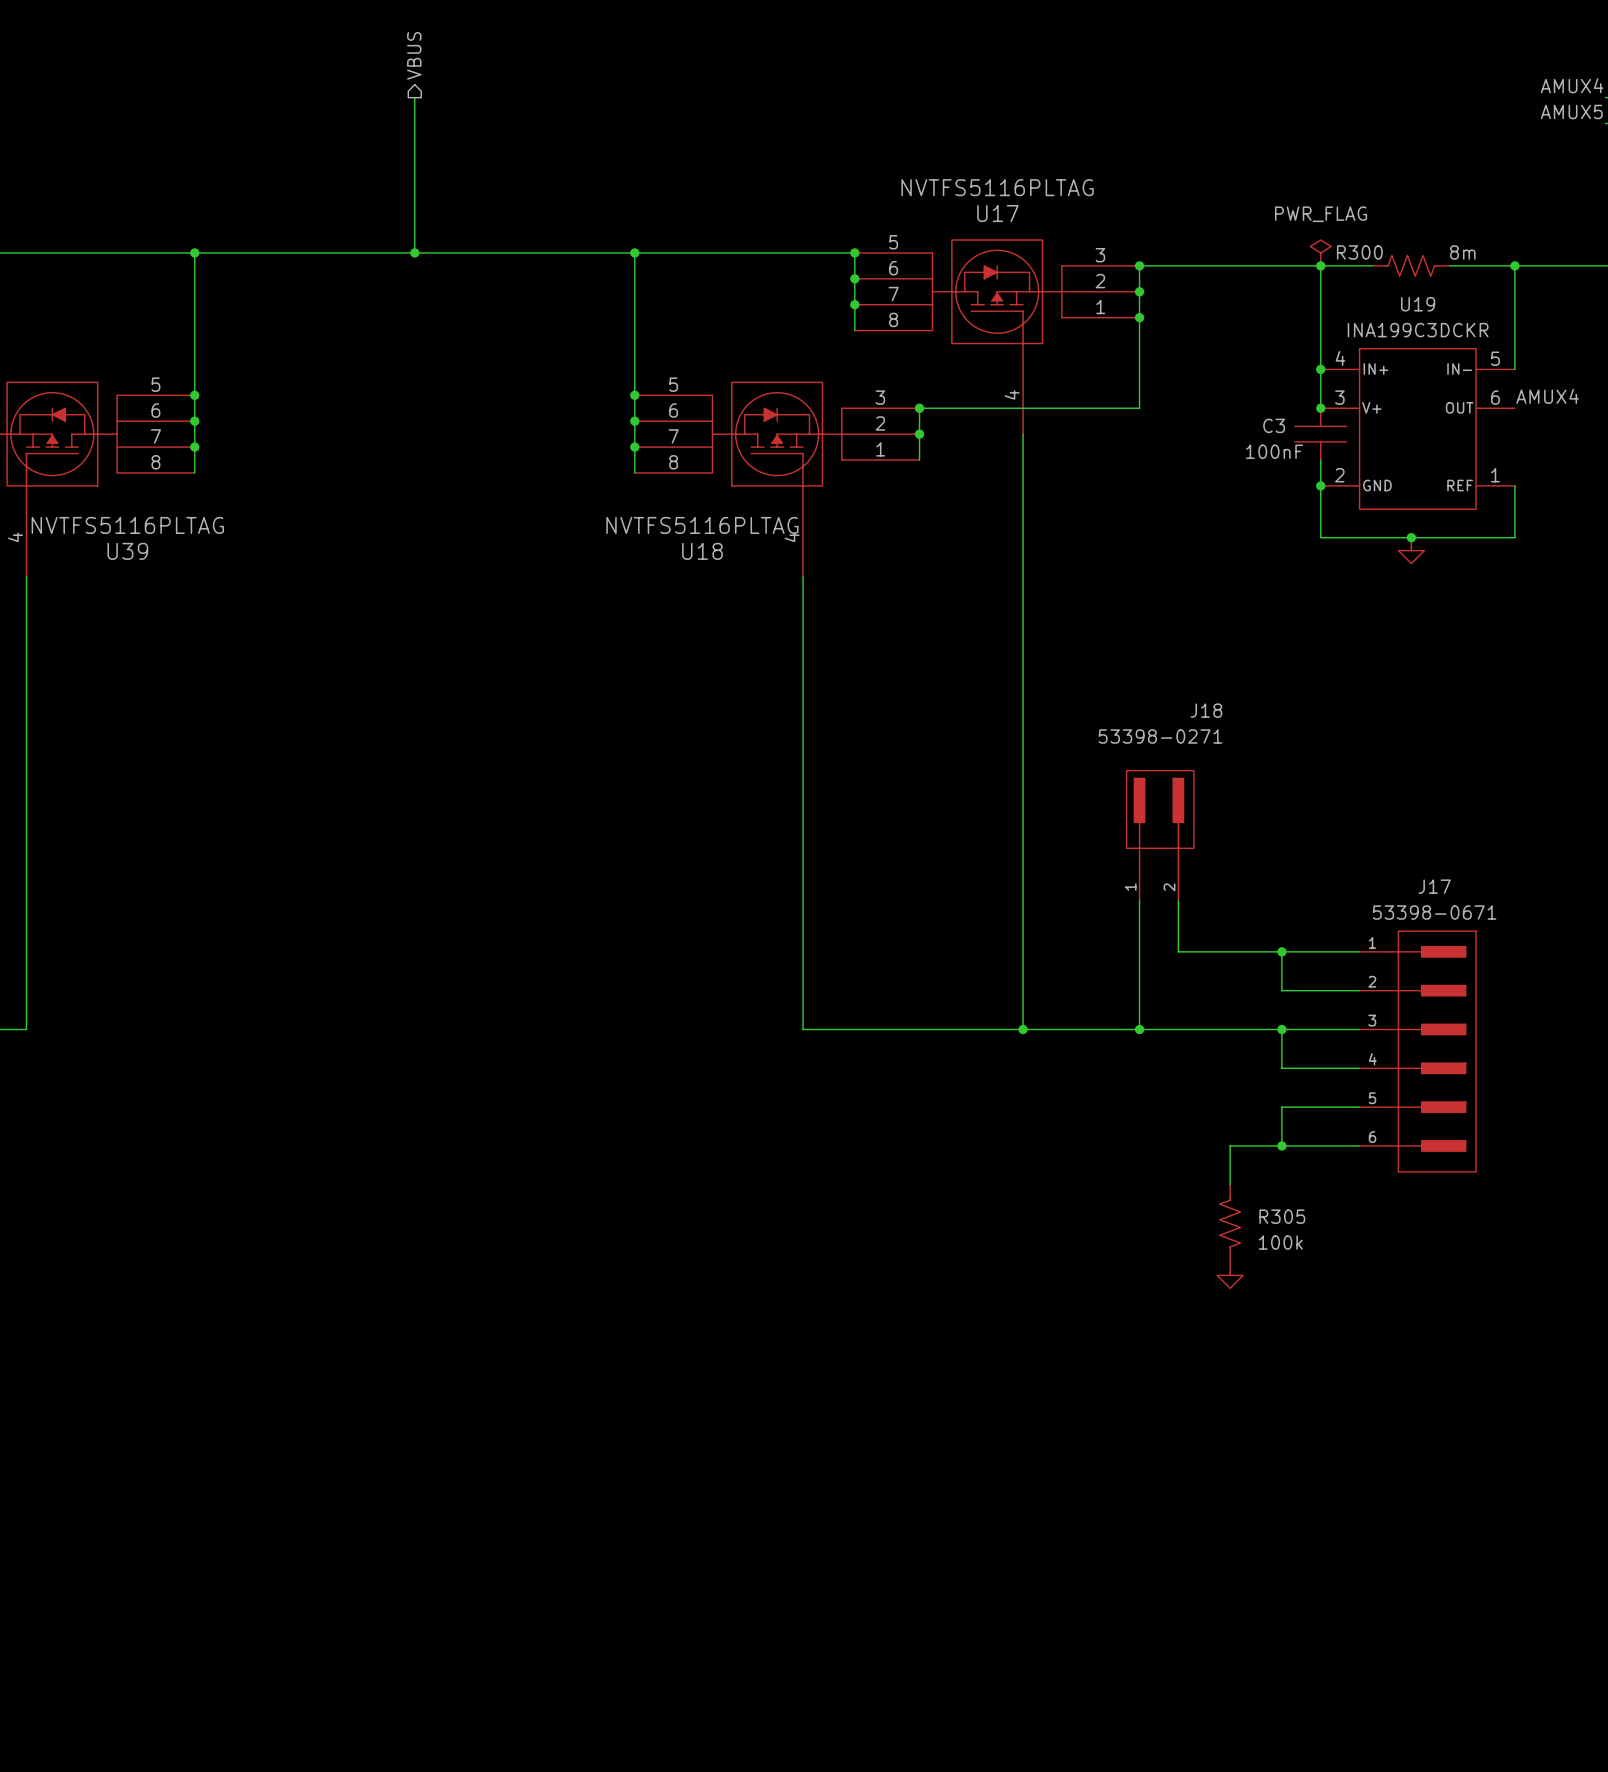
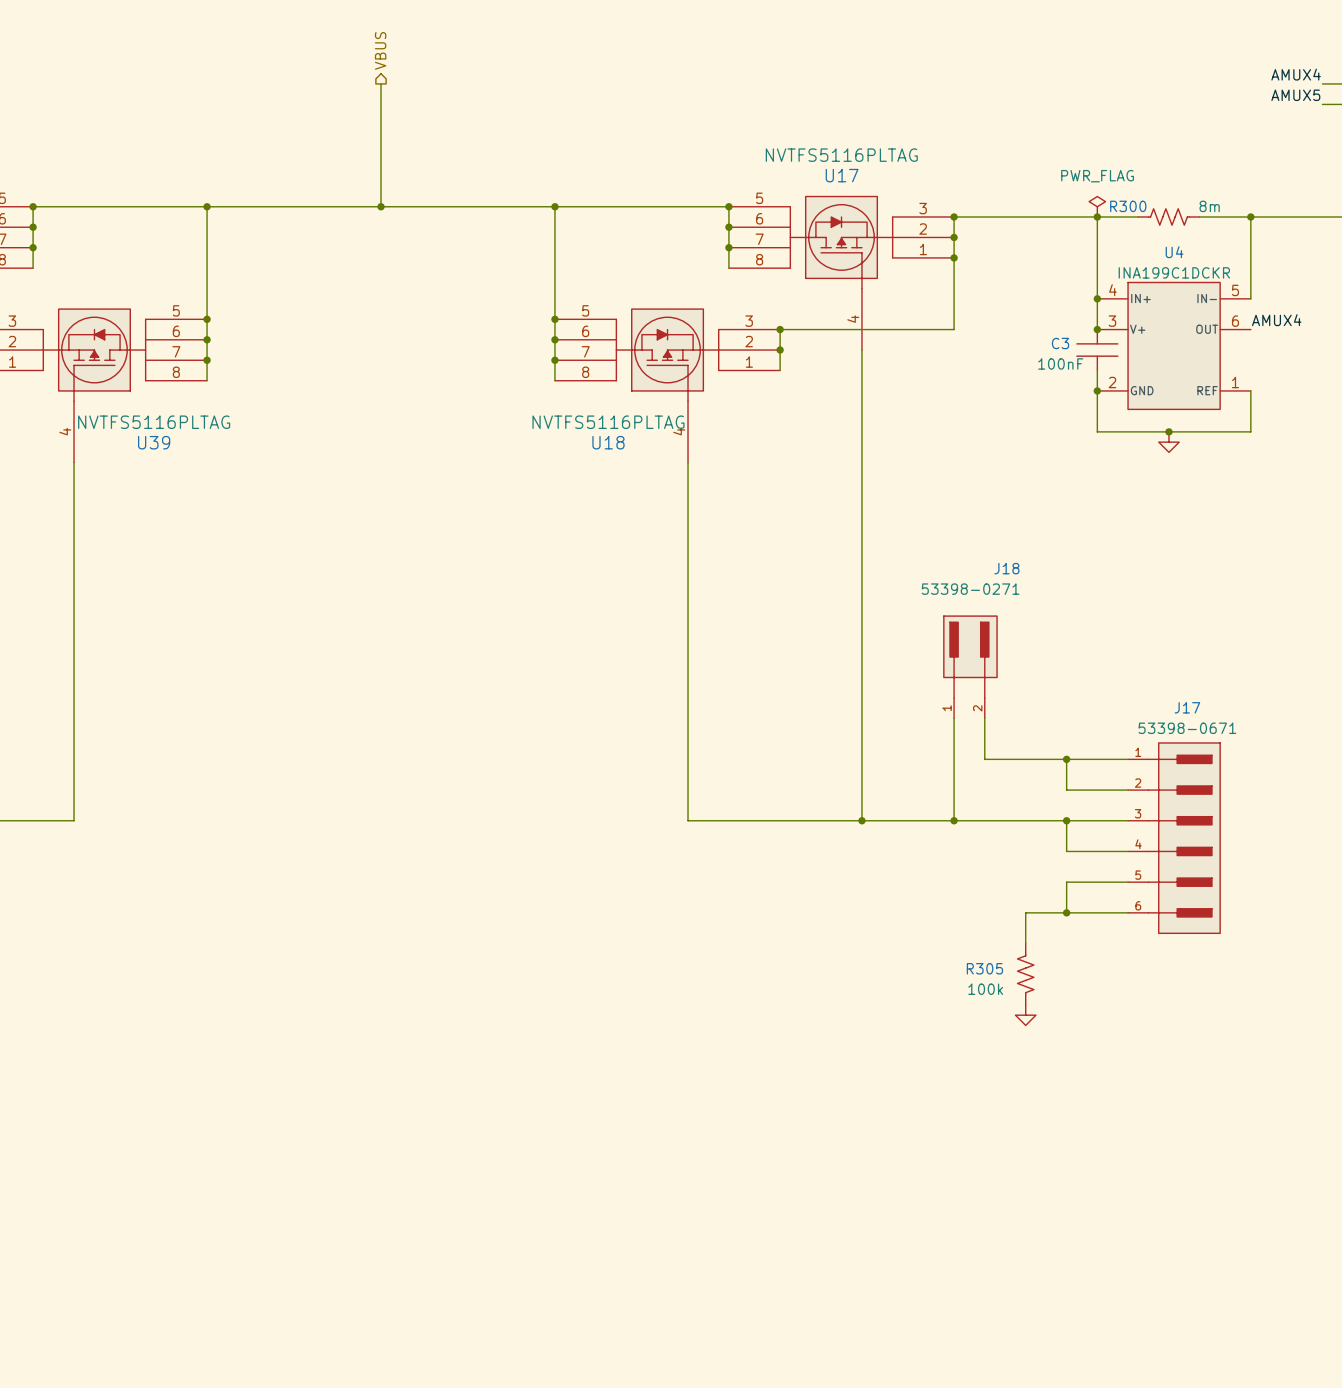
U19 name: U19 (1418, 304) -> U4 (1174, 252)
U19 value: INA199C3DCKR (1418, 330) -> INA199C1DCKR (1174, 272)
R305 name position: R305 (1282, 1216) -> R305 (984, 968)
R305 value position: 100k (1280, 1242) -> 100k (985, 989)

